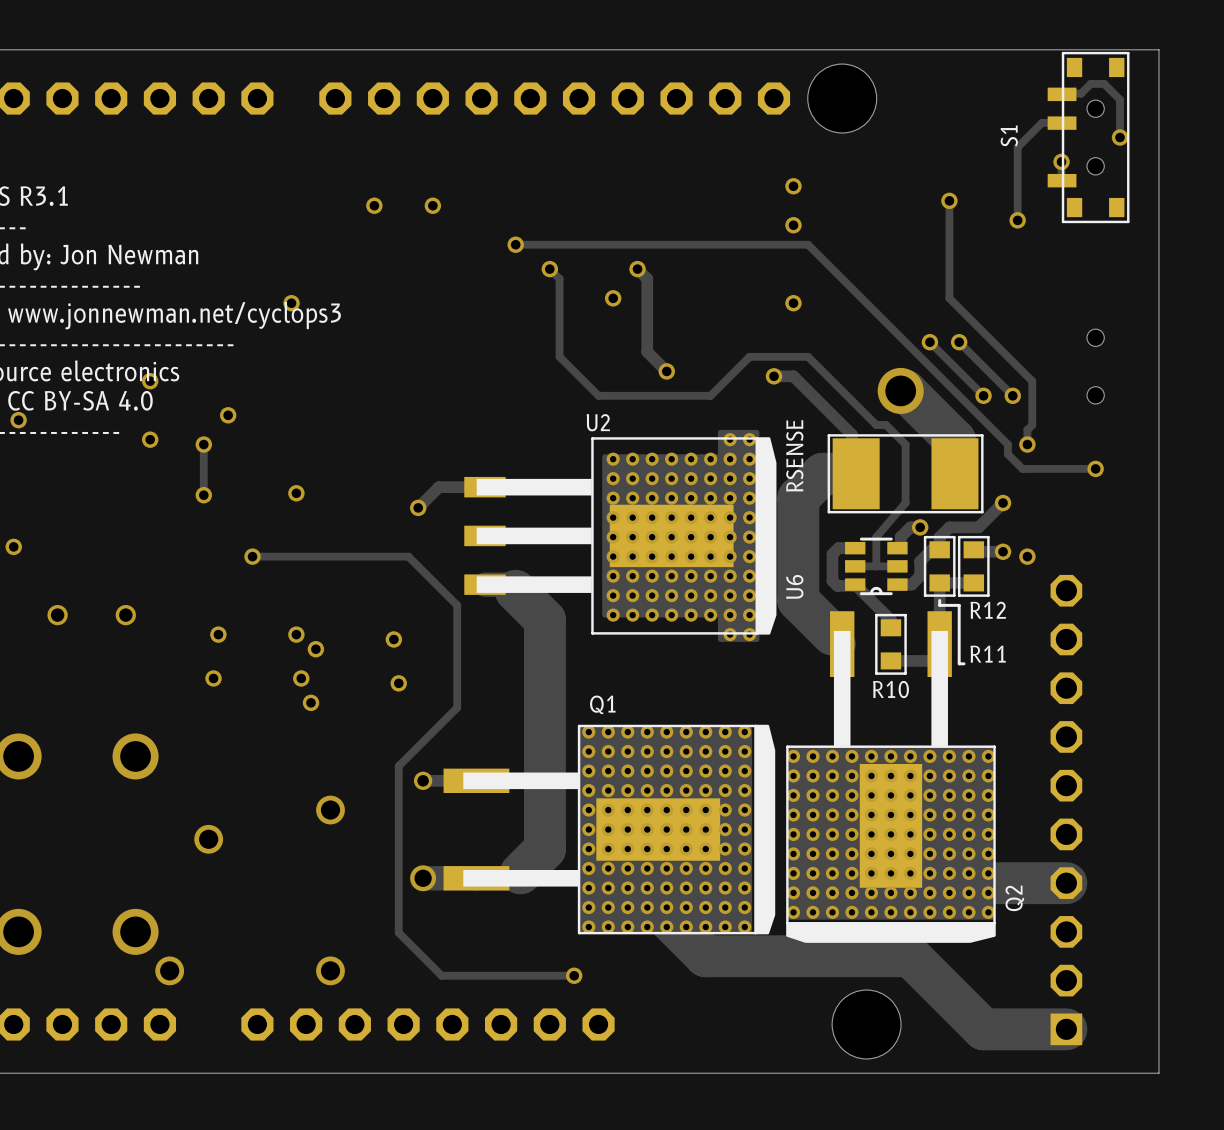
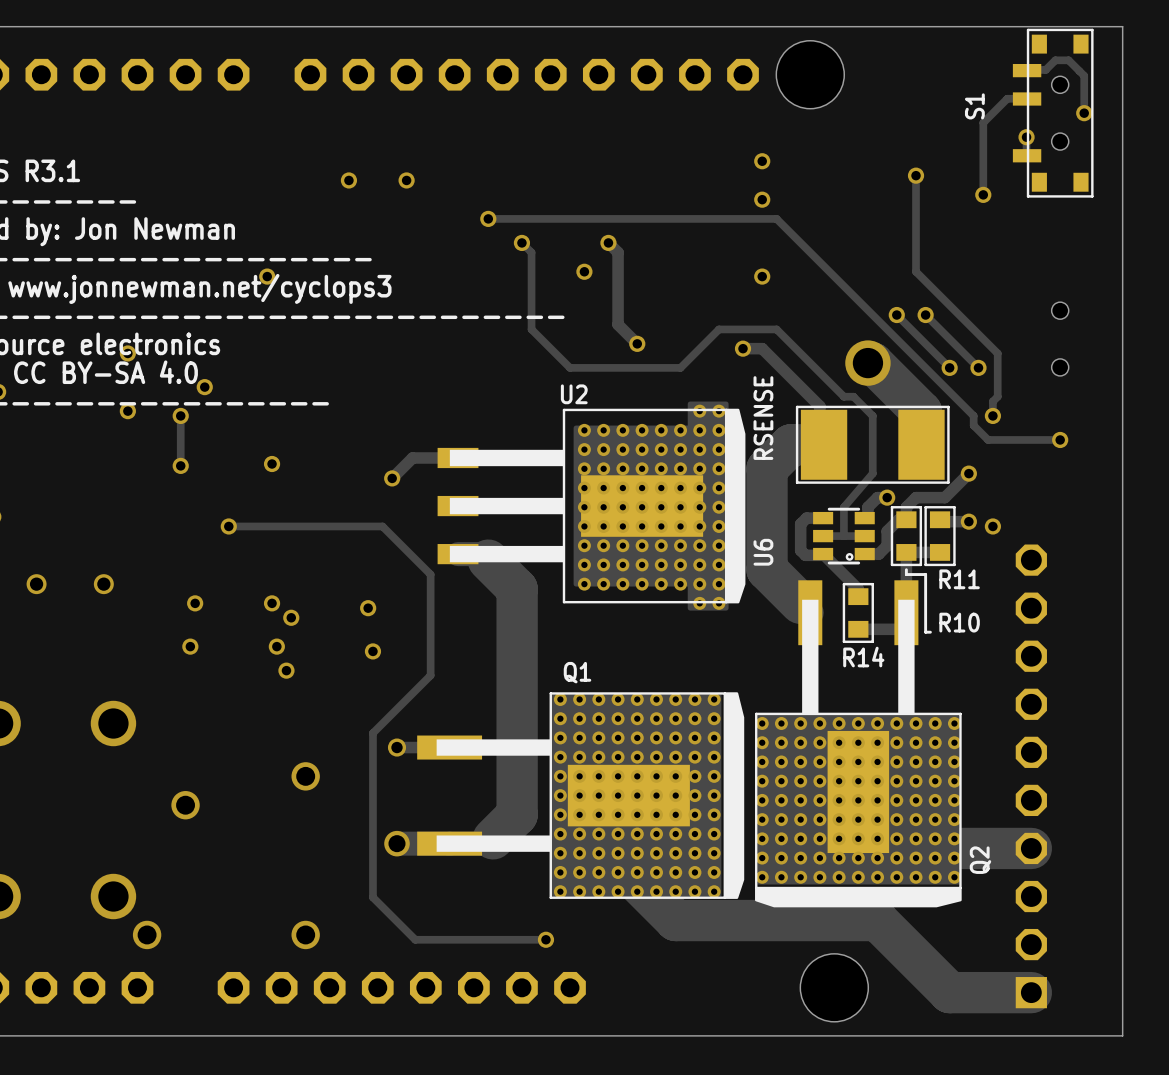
U6 footprint: [845, 537, 908, 596] -> [813, 507, 875, 565]
R12 name: R12 (988, 610) -> R11 (959, 579)
R11 name: R11 (988, 654) -> R10 (959, 622)
R10 name: R10 (890, 689) -> R14 (863, 657)

